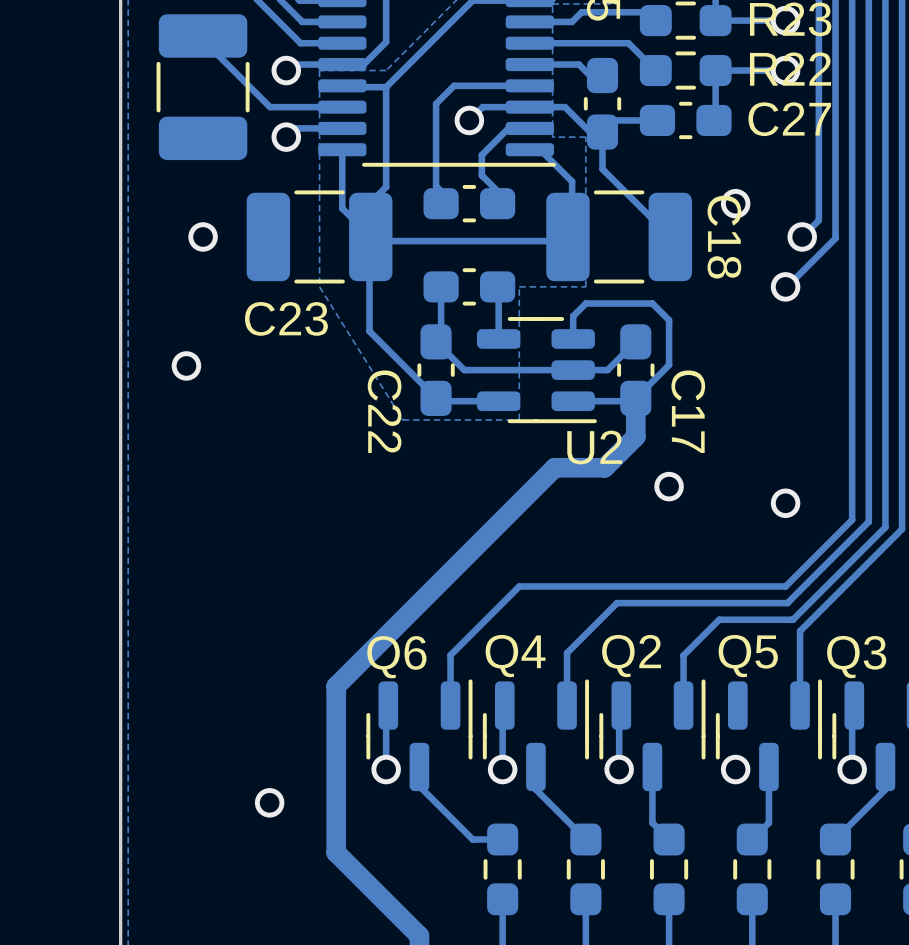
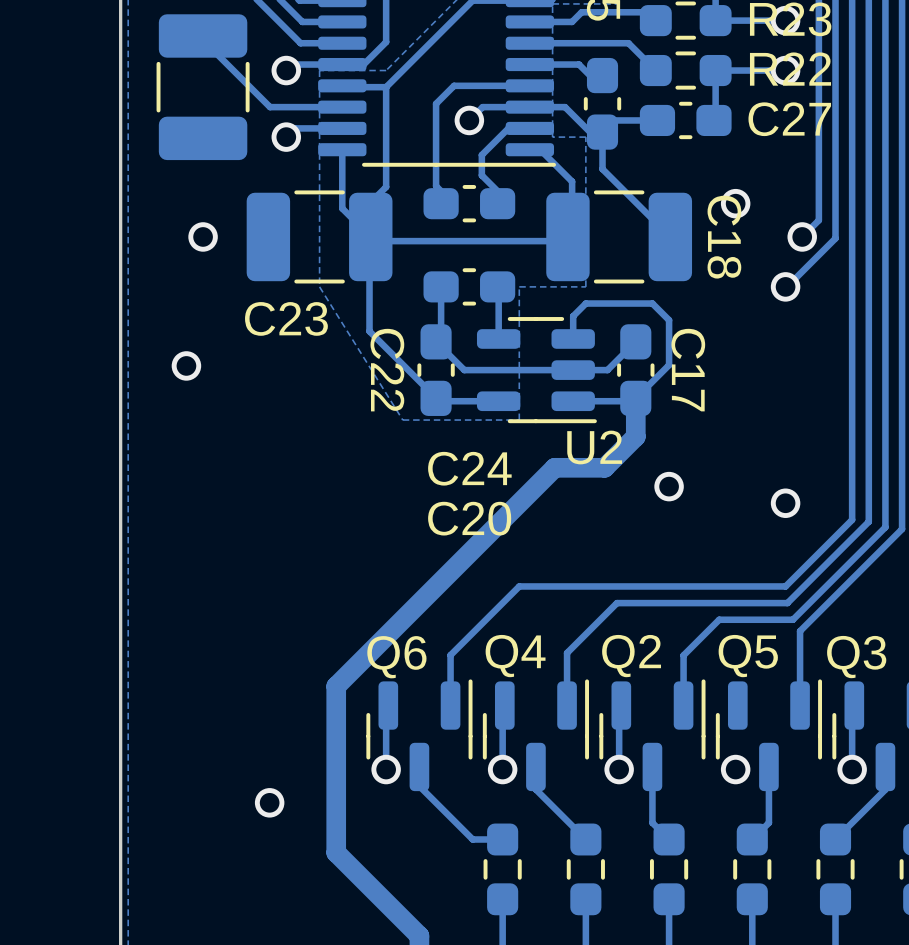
C22 name position: C22 (384, 411) -> C22 (387, 370)
C17 name position: C17 (688, 411) -> C17 (688, 370)
C24 name: none -> C24 (469, 468)
C20 name: none -> C20 (469, 518)

